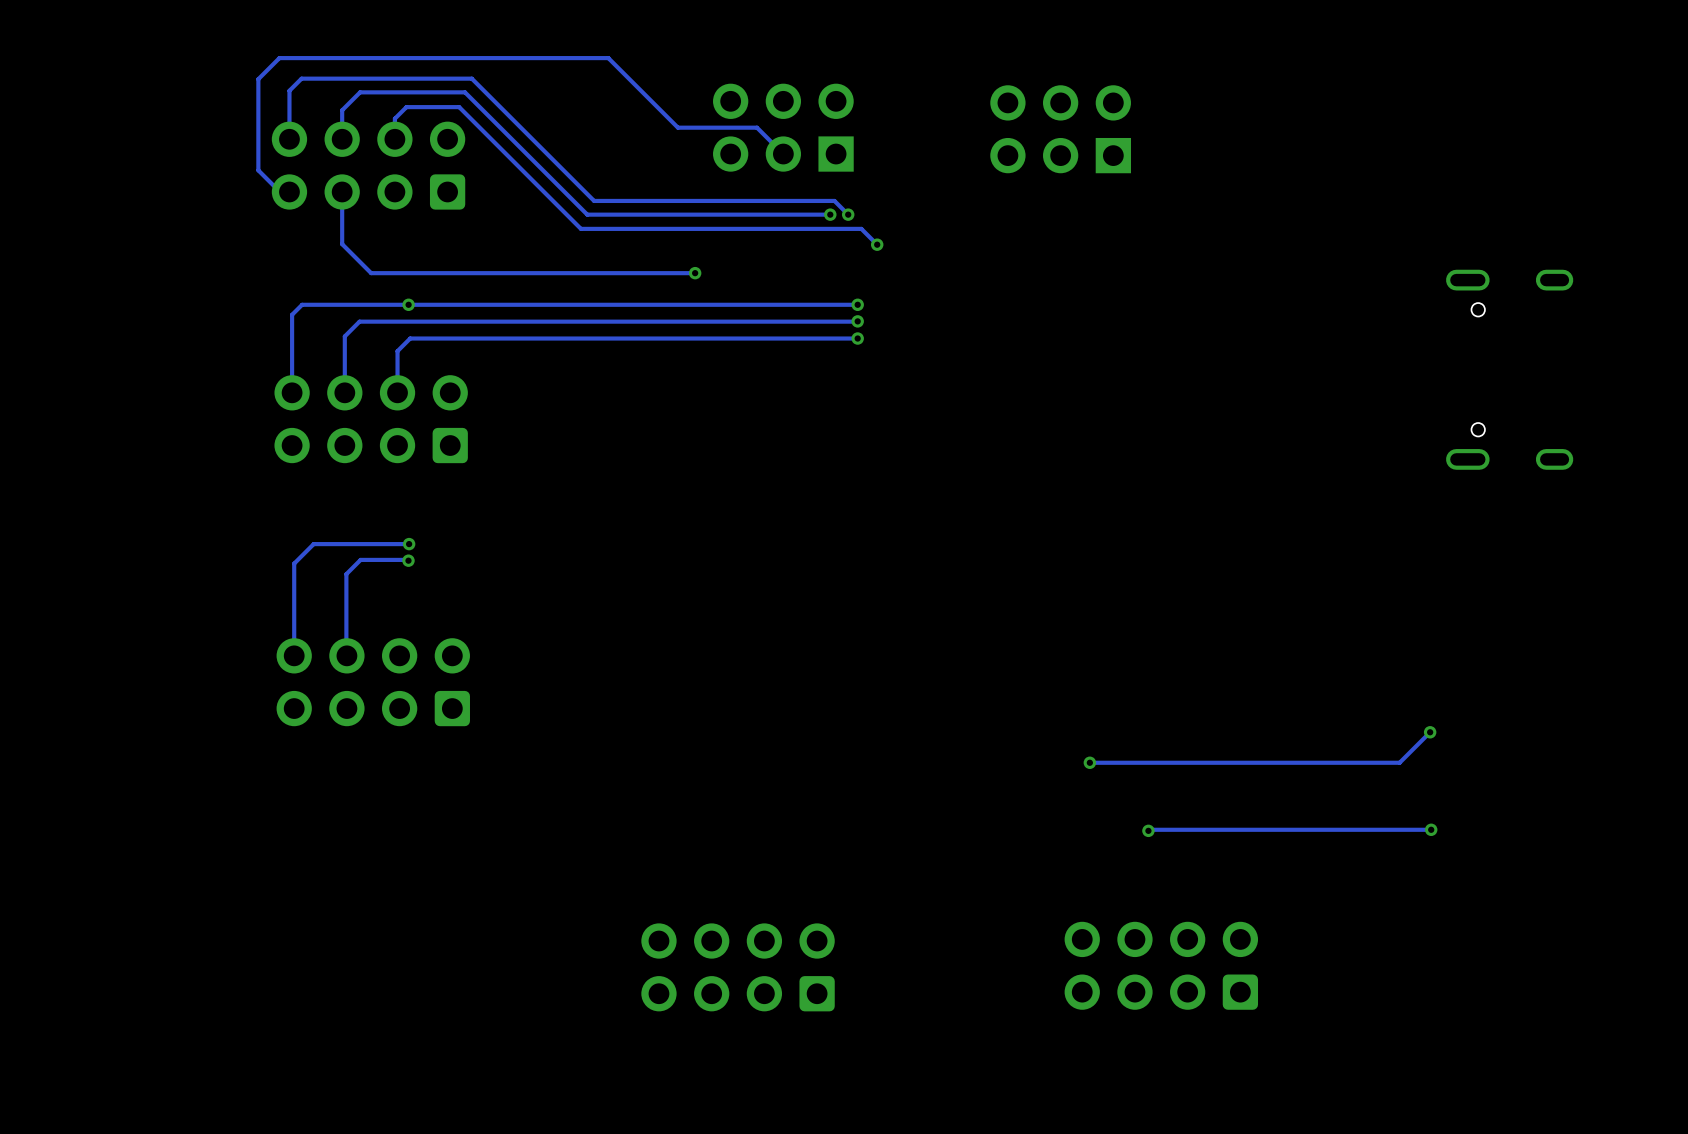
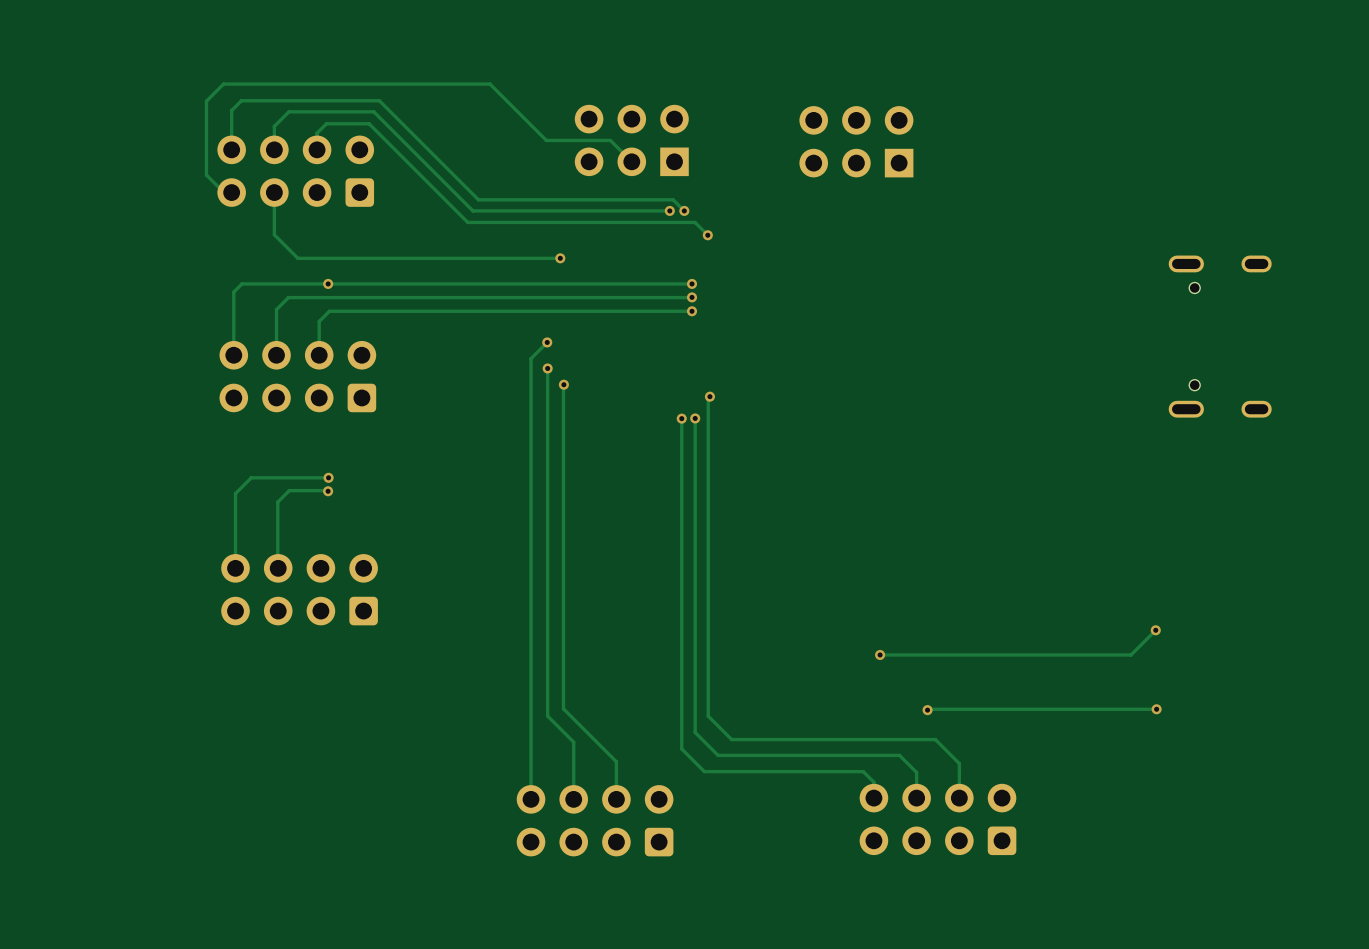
track: none -> (547, 342) (531, 358) (531, 799)
via: none -> (547, 342)
track: none -> (547, 368) (547, 716) (573, 742) (573, 799)
via: none -> (547, 368)
track: none -> (563, 384) (563, 708) (616, 761) (616, 799)
via: none -> (563, 384)
track: none -> (709, 396) (708, 398) (708, 716) (731, 739) (935, 739) (959, 763) (959, 798)
via: none -> (709, 396)
track: none -> (695, 418) (695, 732) (718, 755) (899, 755) (916, 772) (916, 798)
via: none -> (695, 418)
track: none -> (681, 418) (681, 748) (704, 771) (863, 771) (873, 782) (873, 798)
via: none -> (681, 418)

